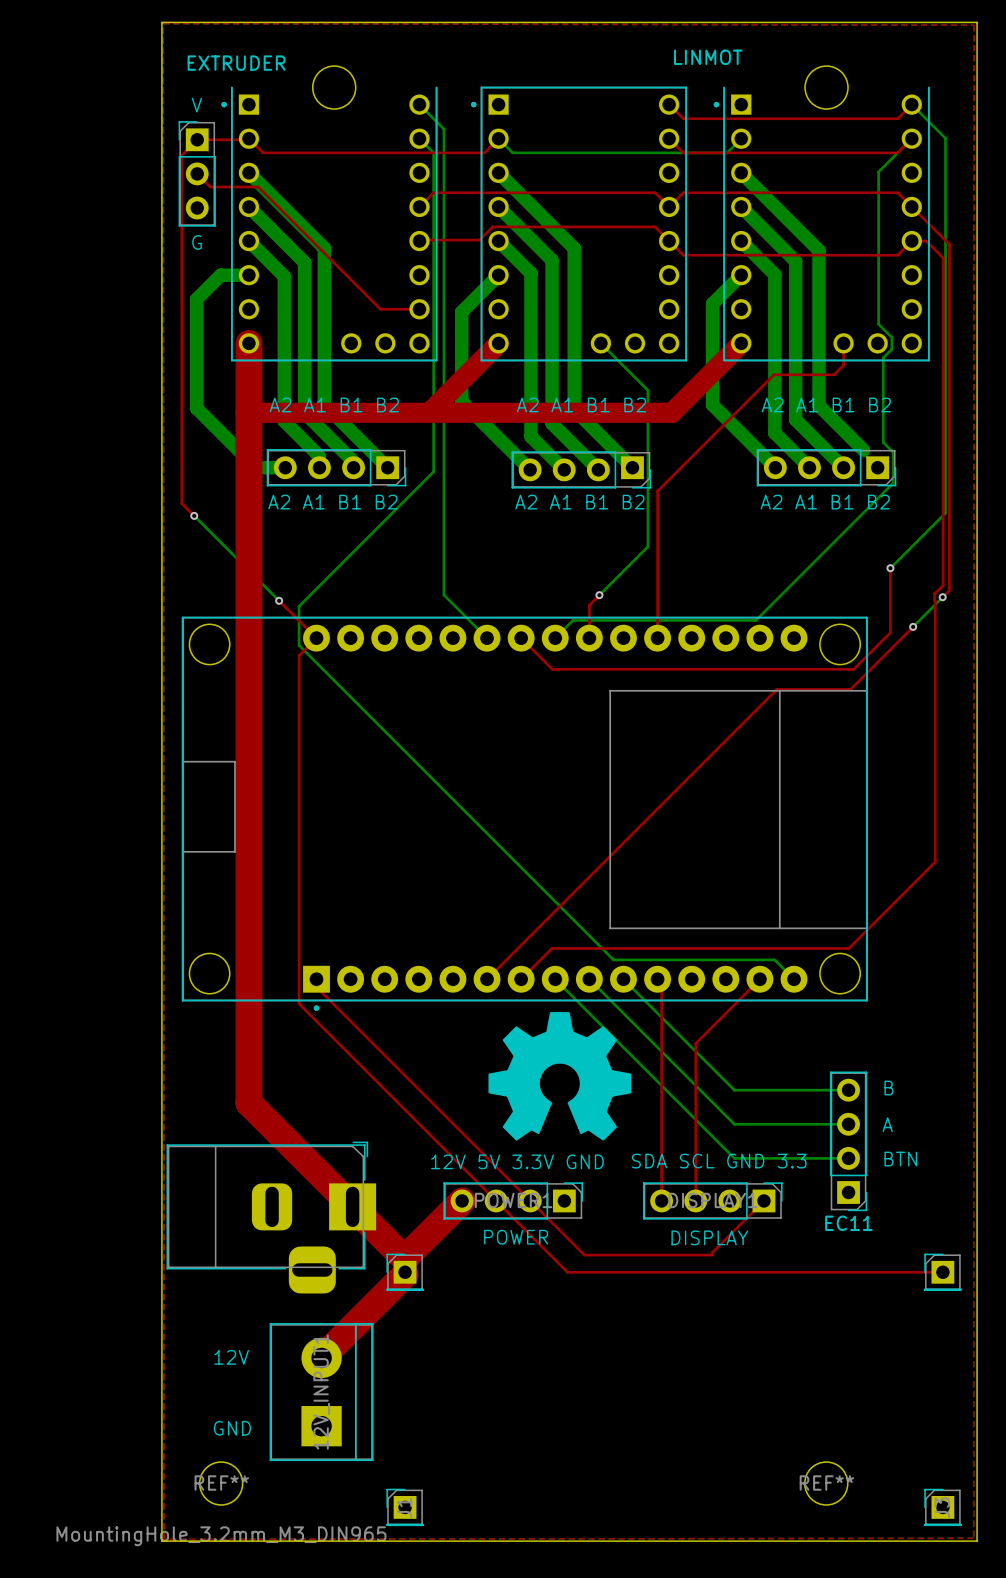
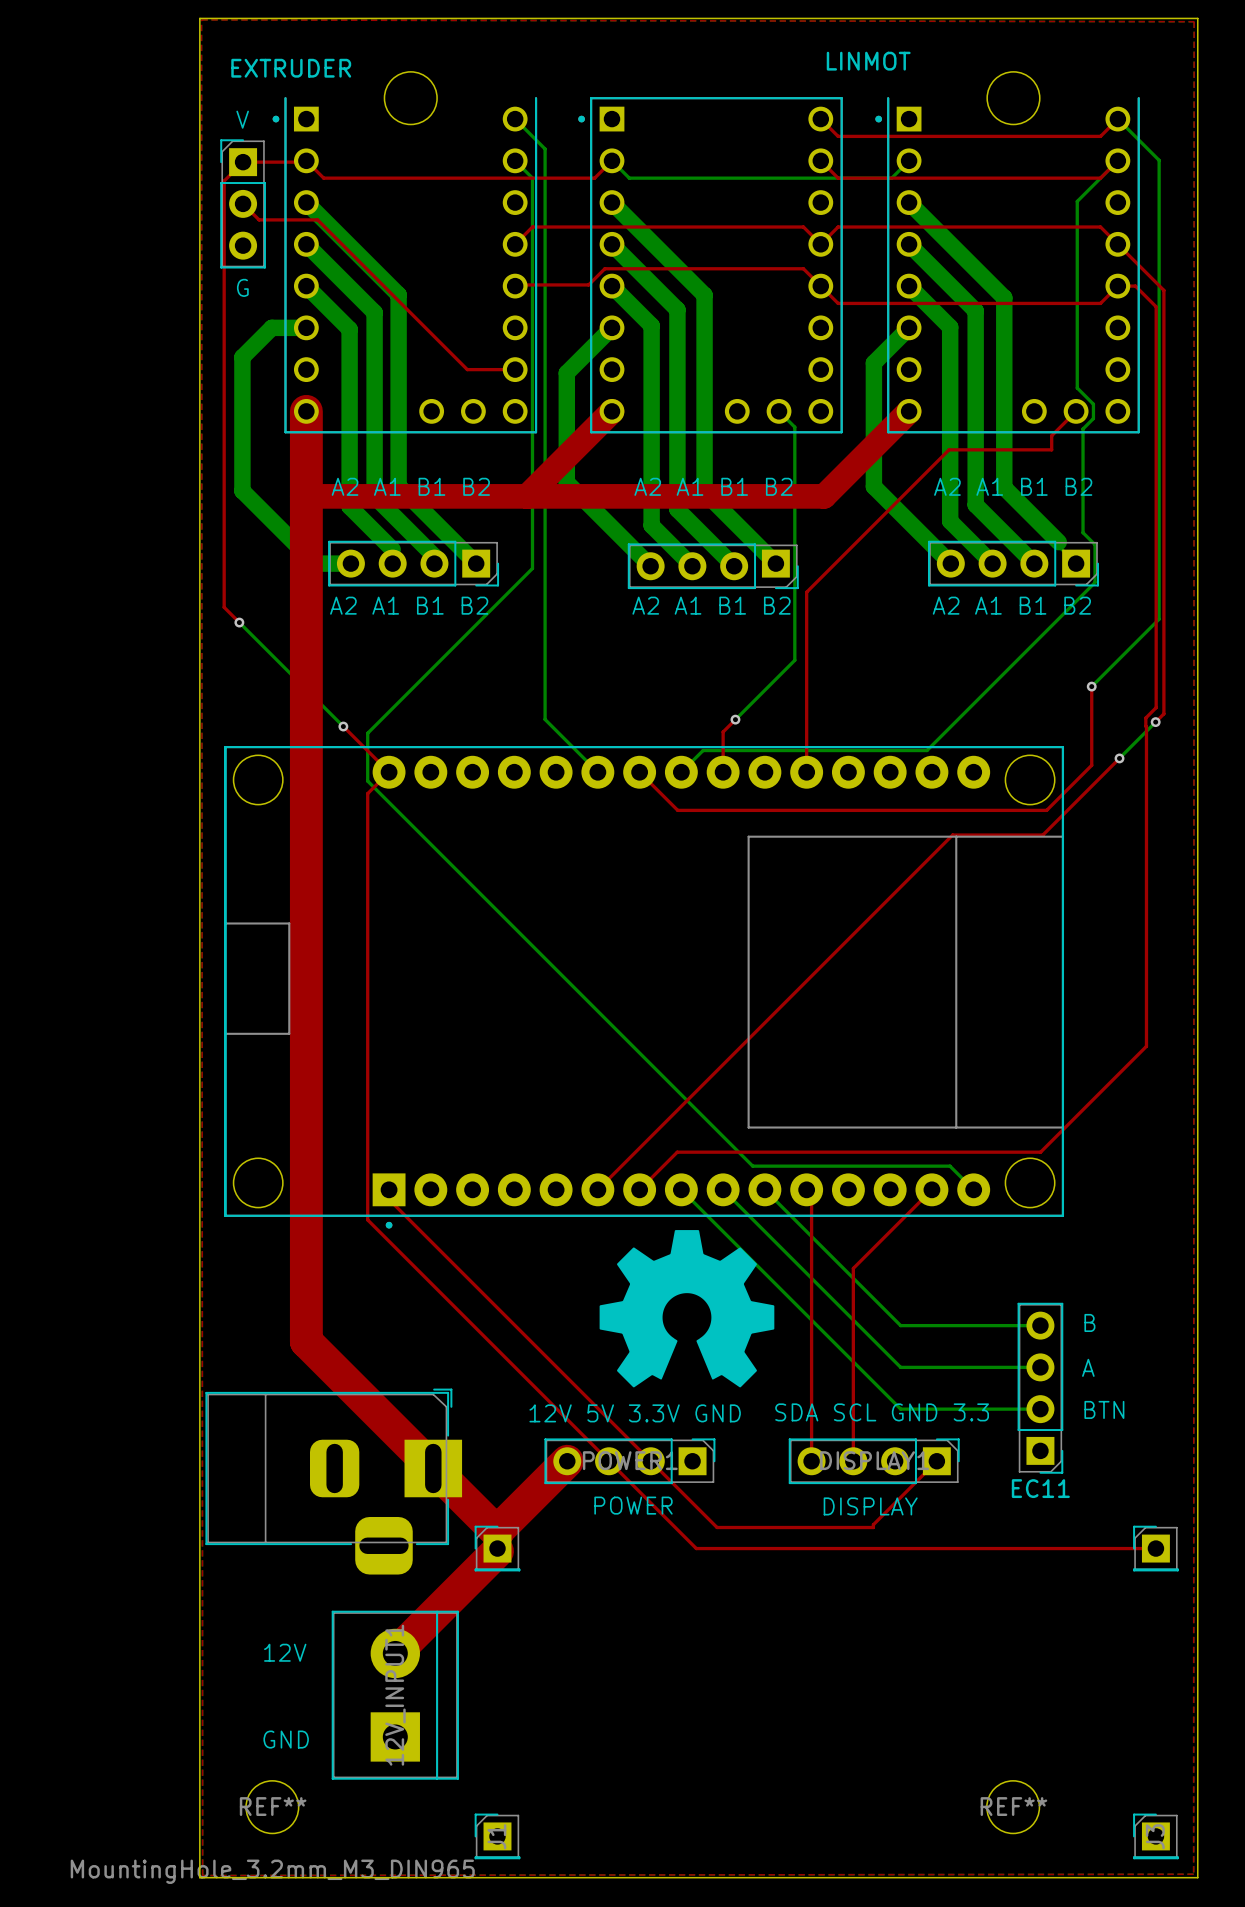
bottom track: (600, 343) (647, 390) -> (779, 411) (794, 427) (794, 468)
top track: (843, 343) (843, 365) (833, 374) -> (1076, 411) (1051, 435) (1051, 449) (1022, 449)

